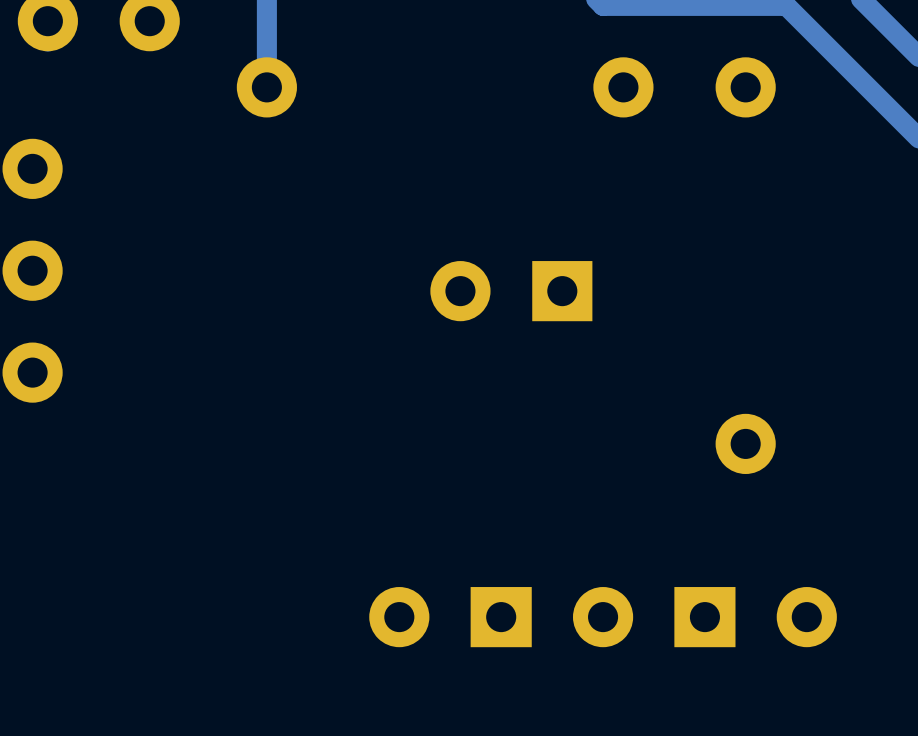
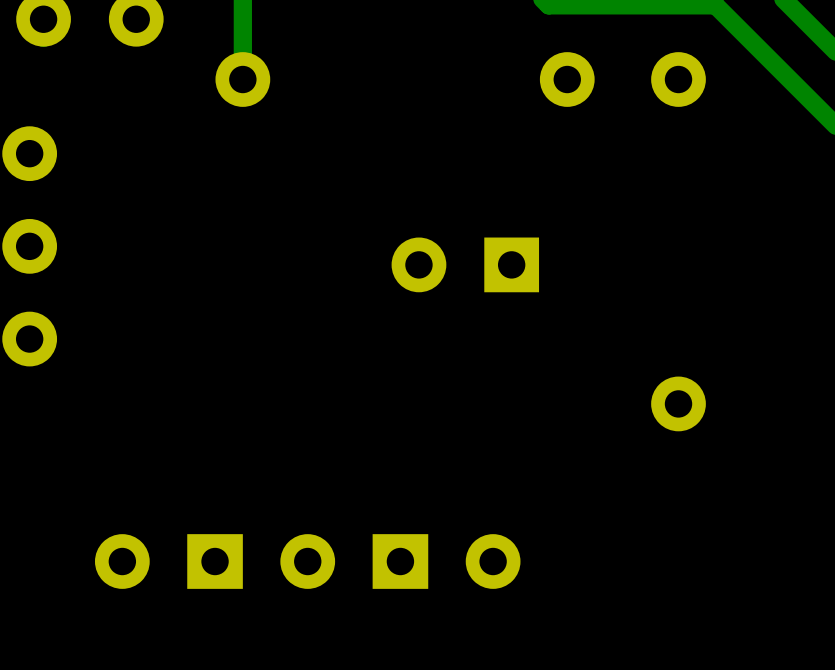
part position: (603, 617) -> (307, 561)

